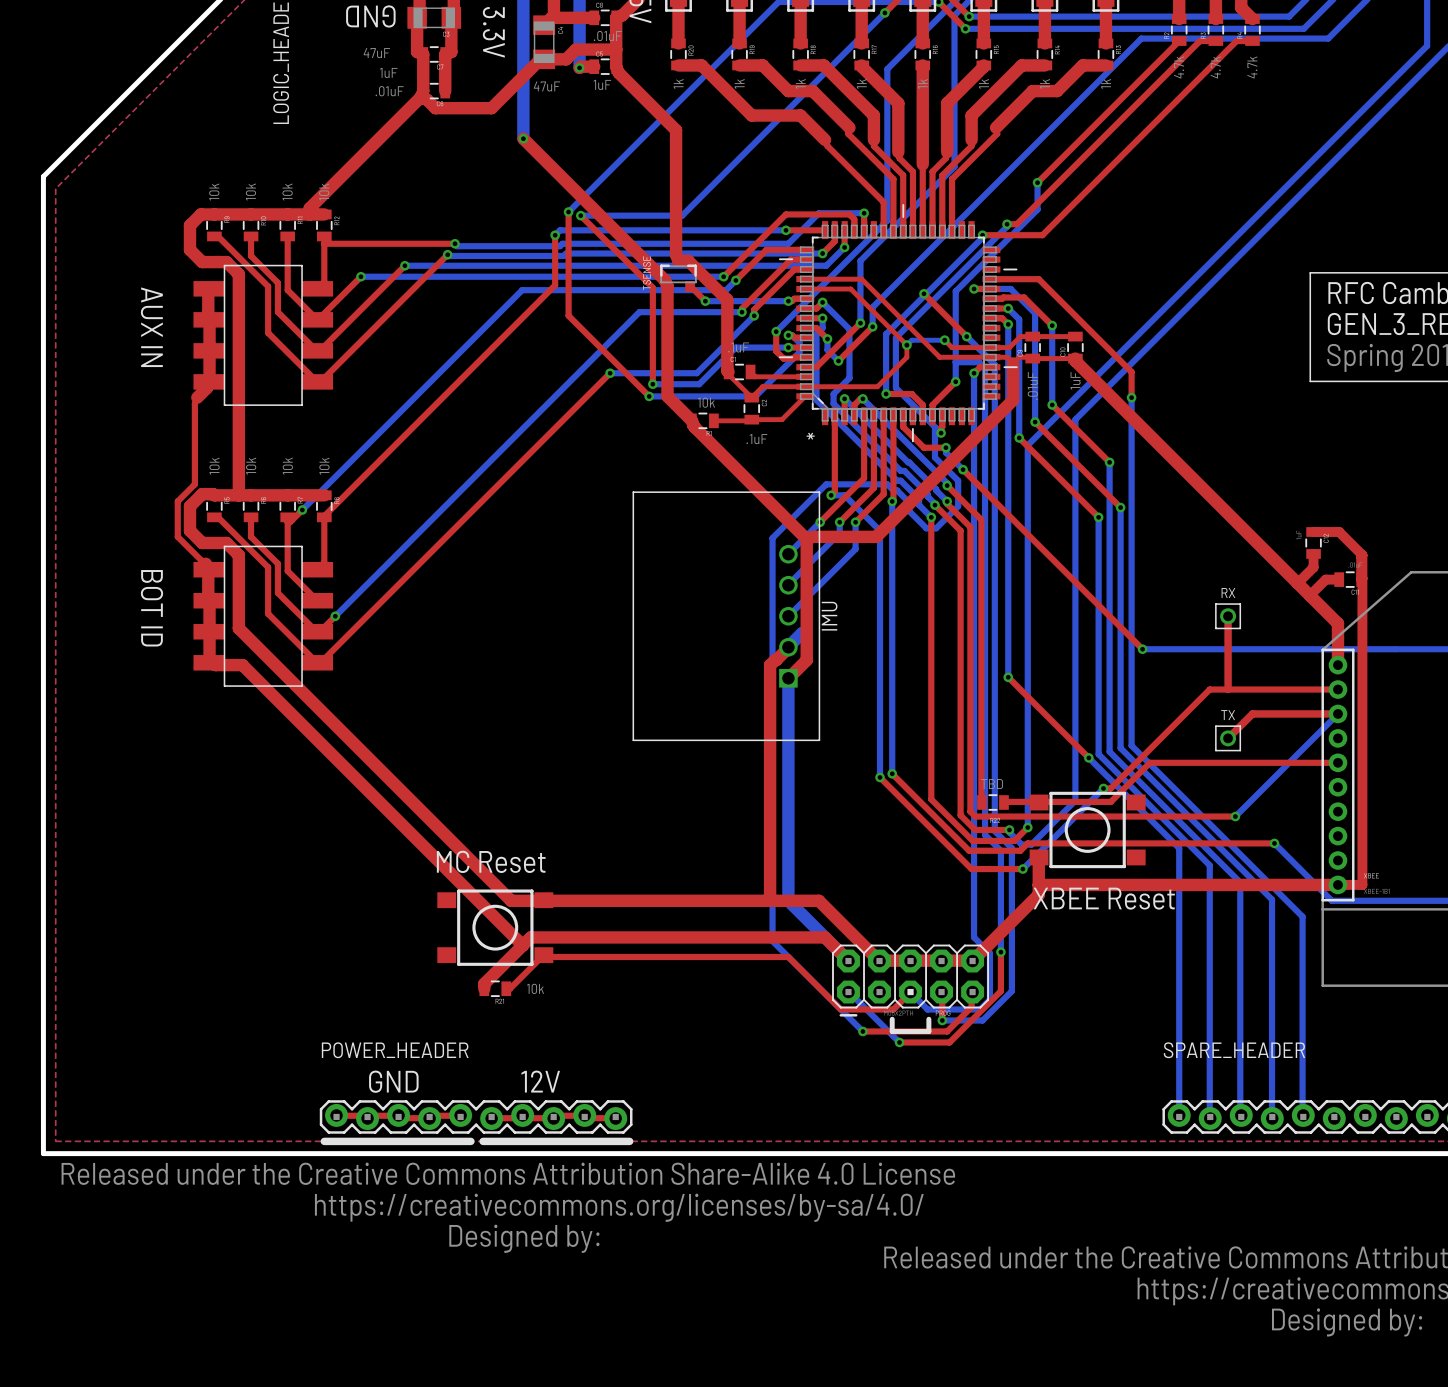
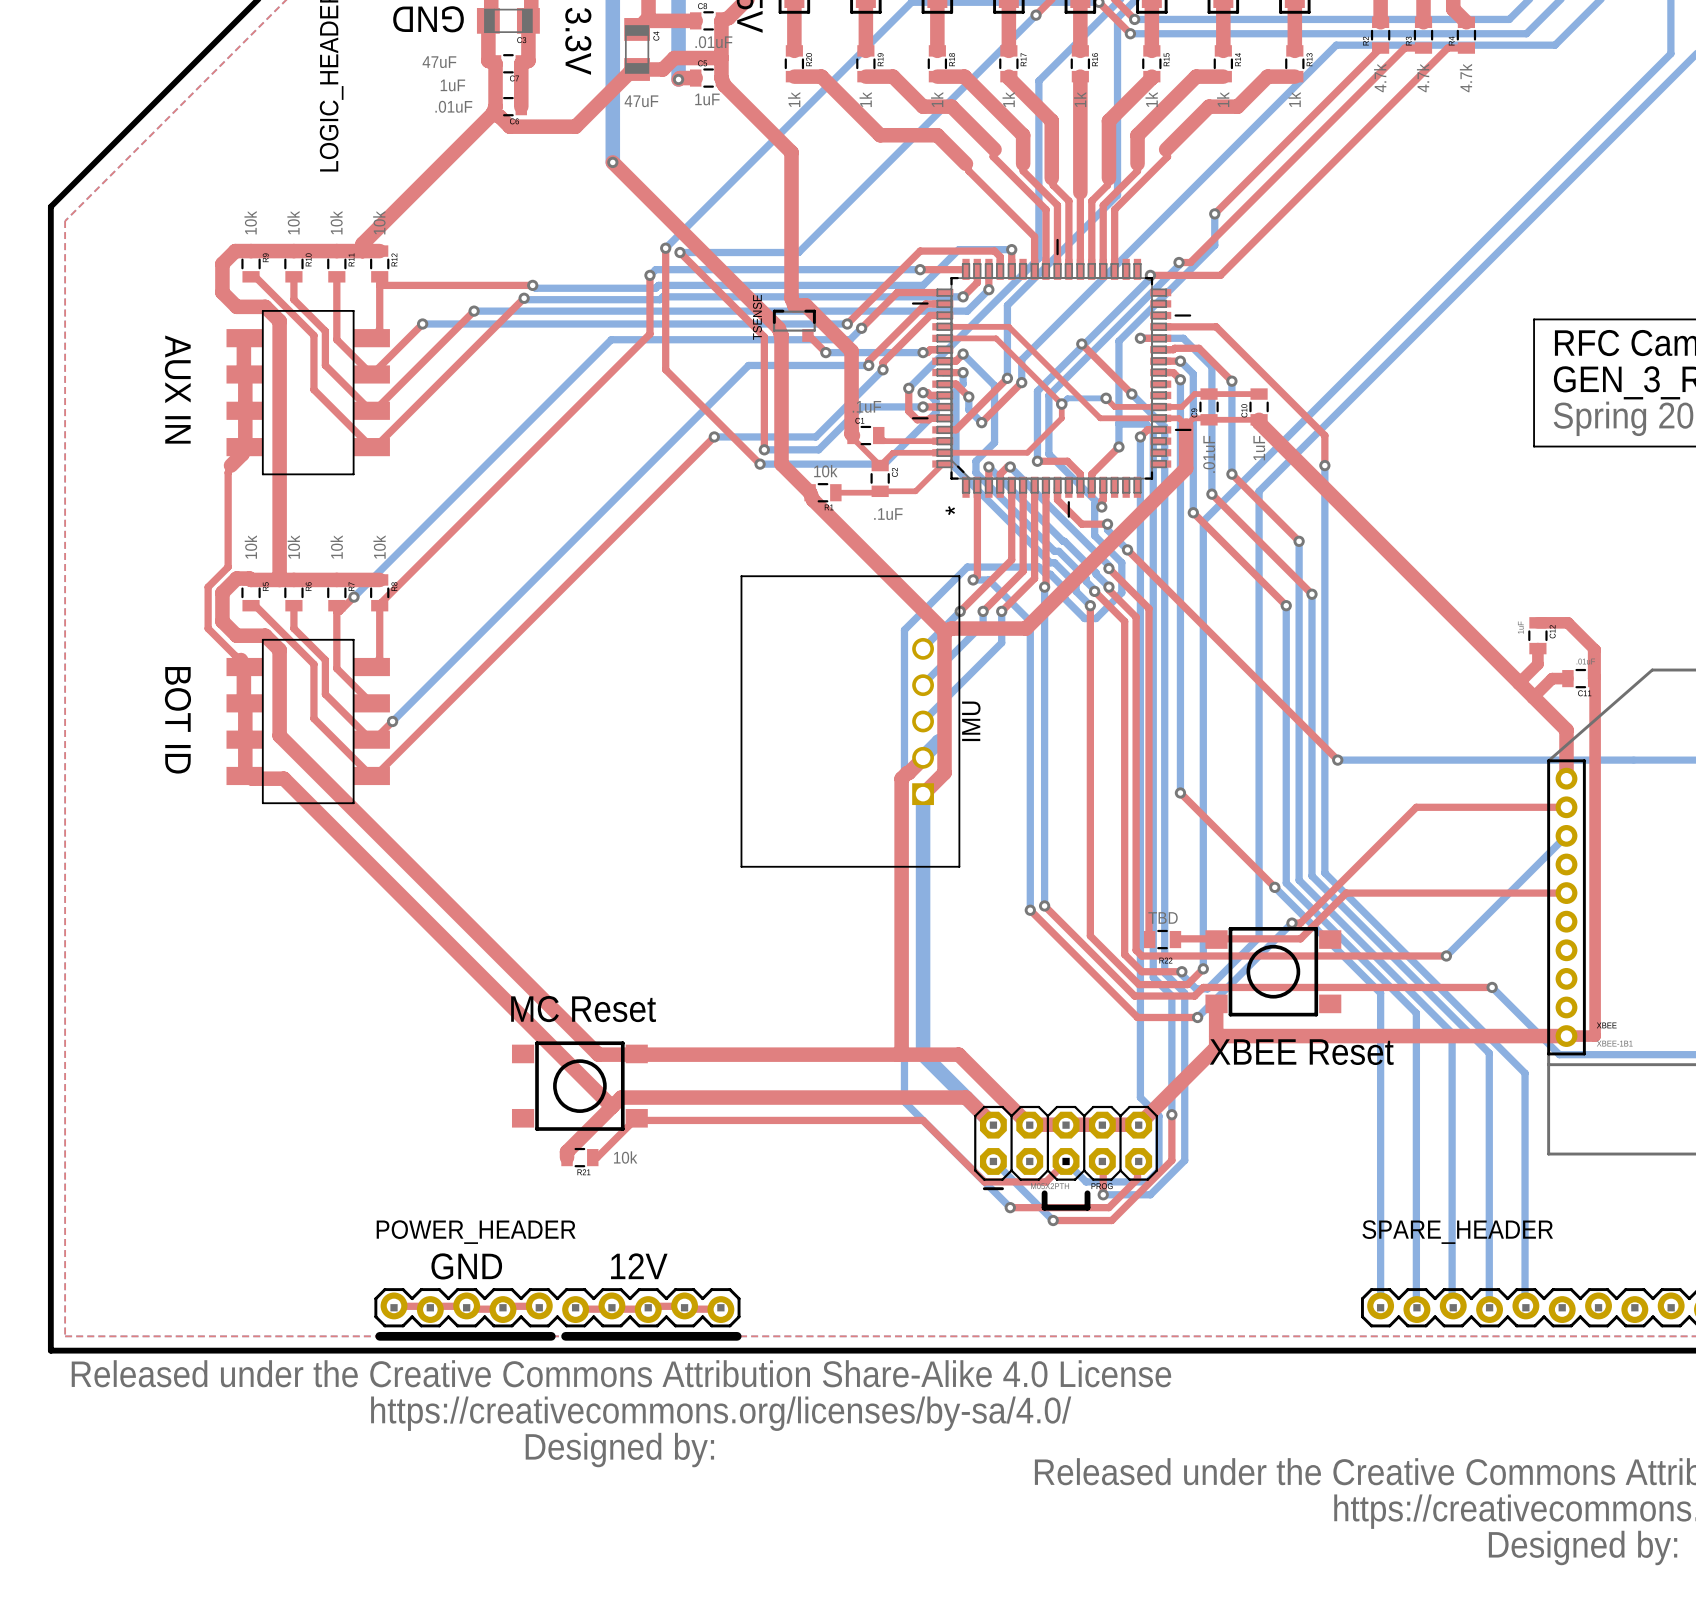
top track: (1228, 616) (1228, 689) -> none
RX: (1228, 616) -> none
top track: (1337, 713) (1252, 713) (1228, 738) -> none
TX: (1228, 738) -> none

